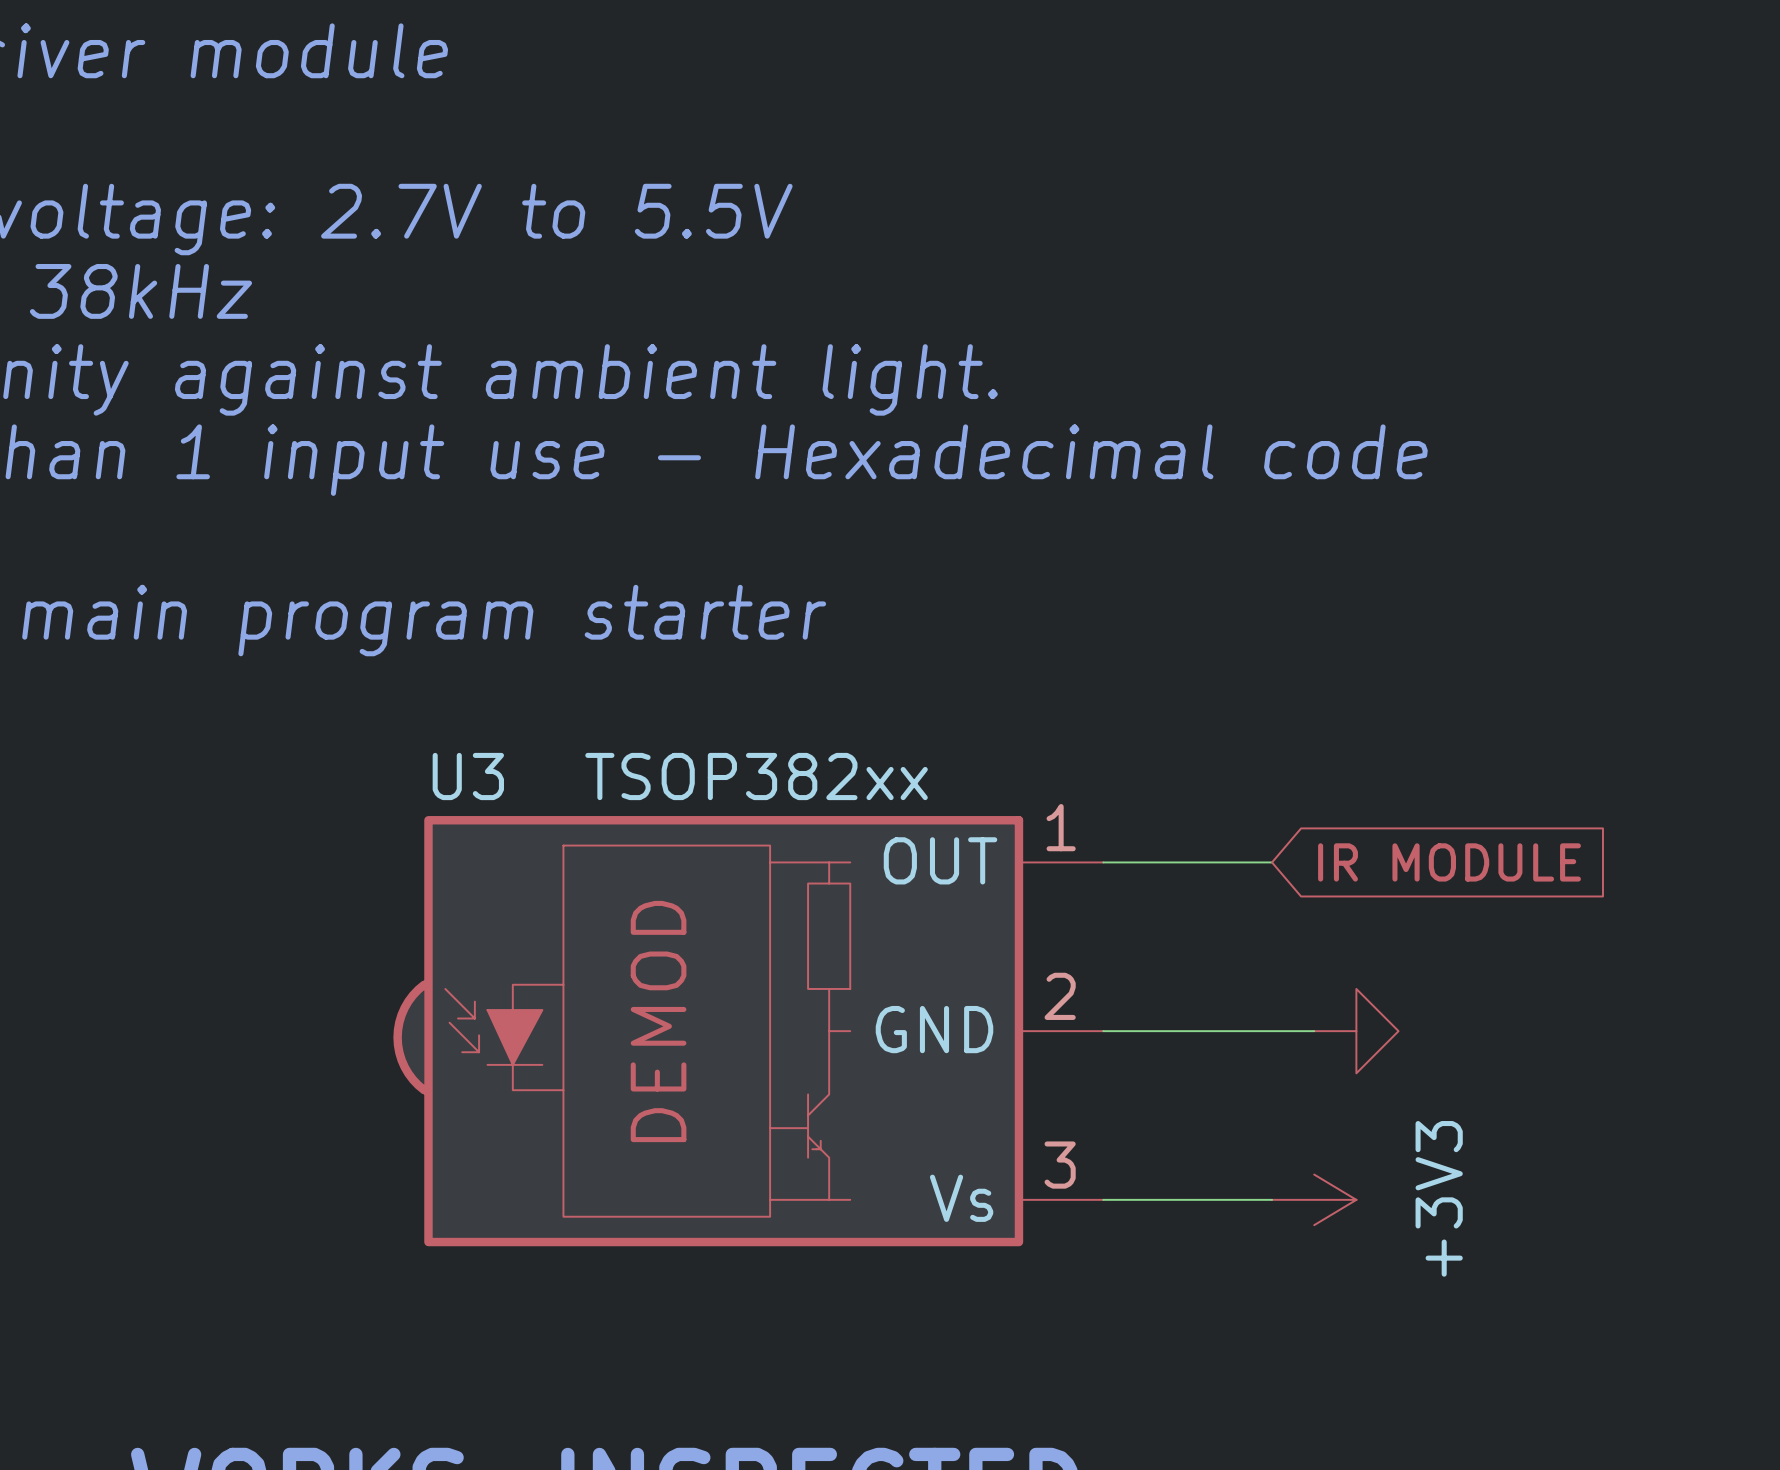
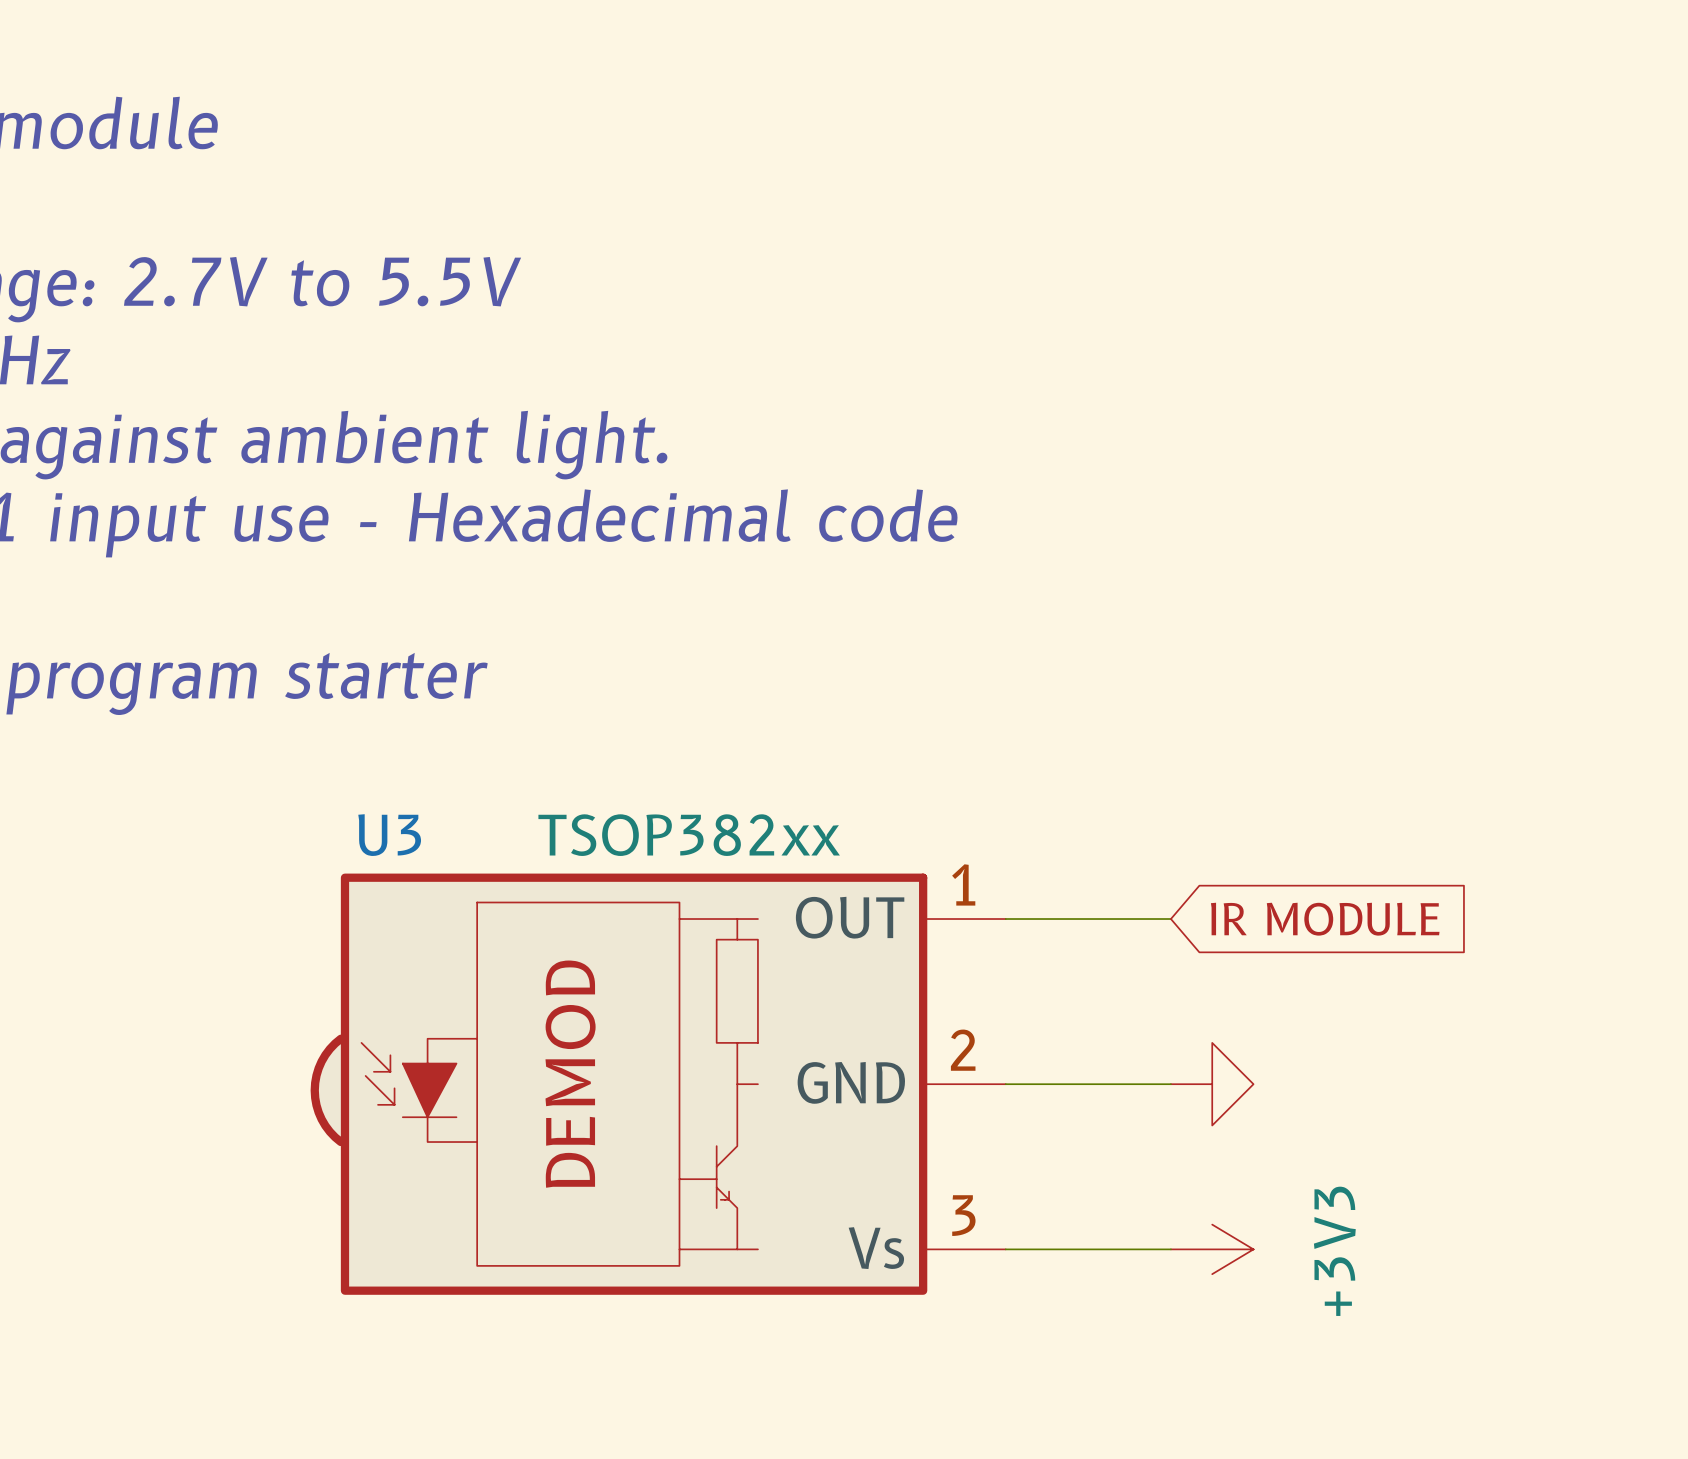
power symbol position: (1356, 1031) -> (1212, 1084)

